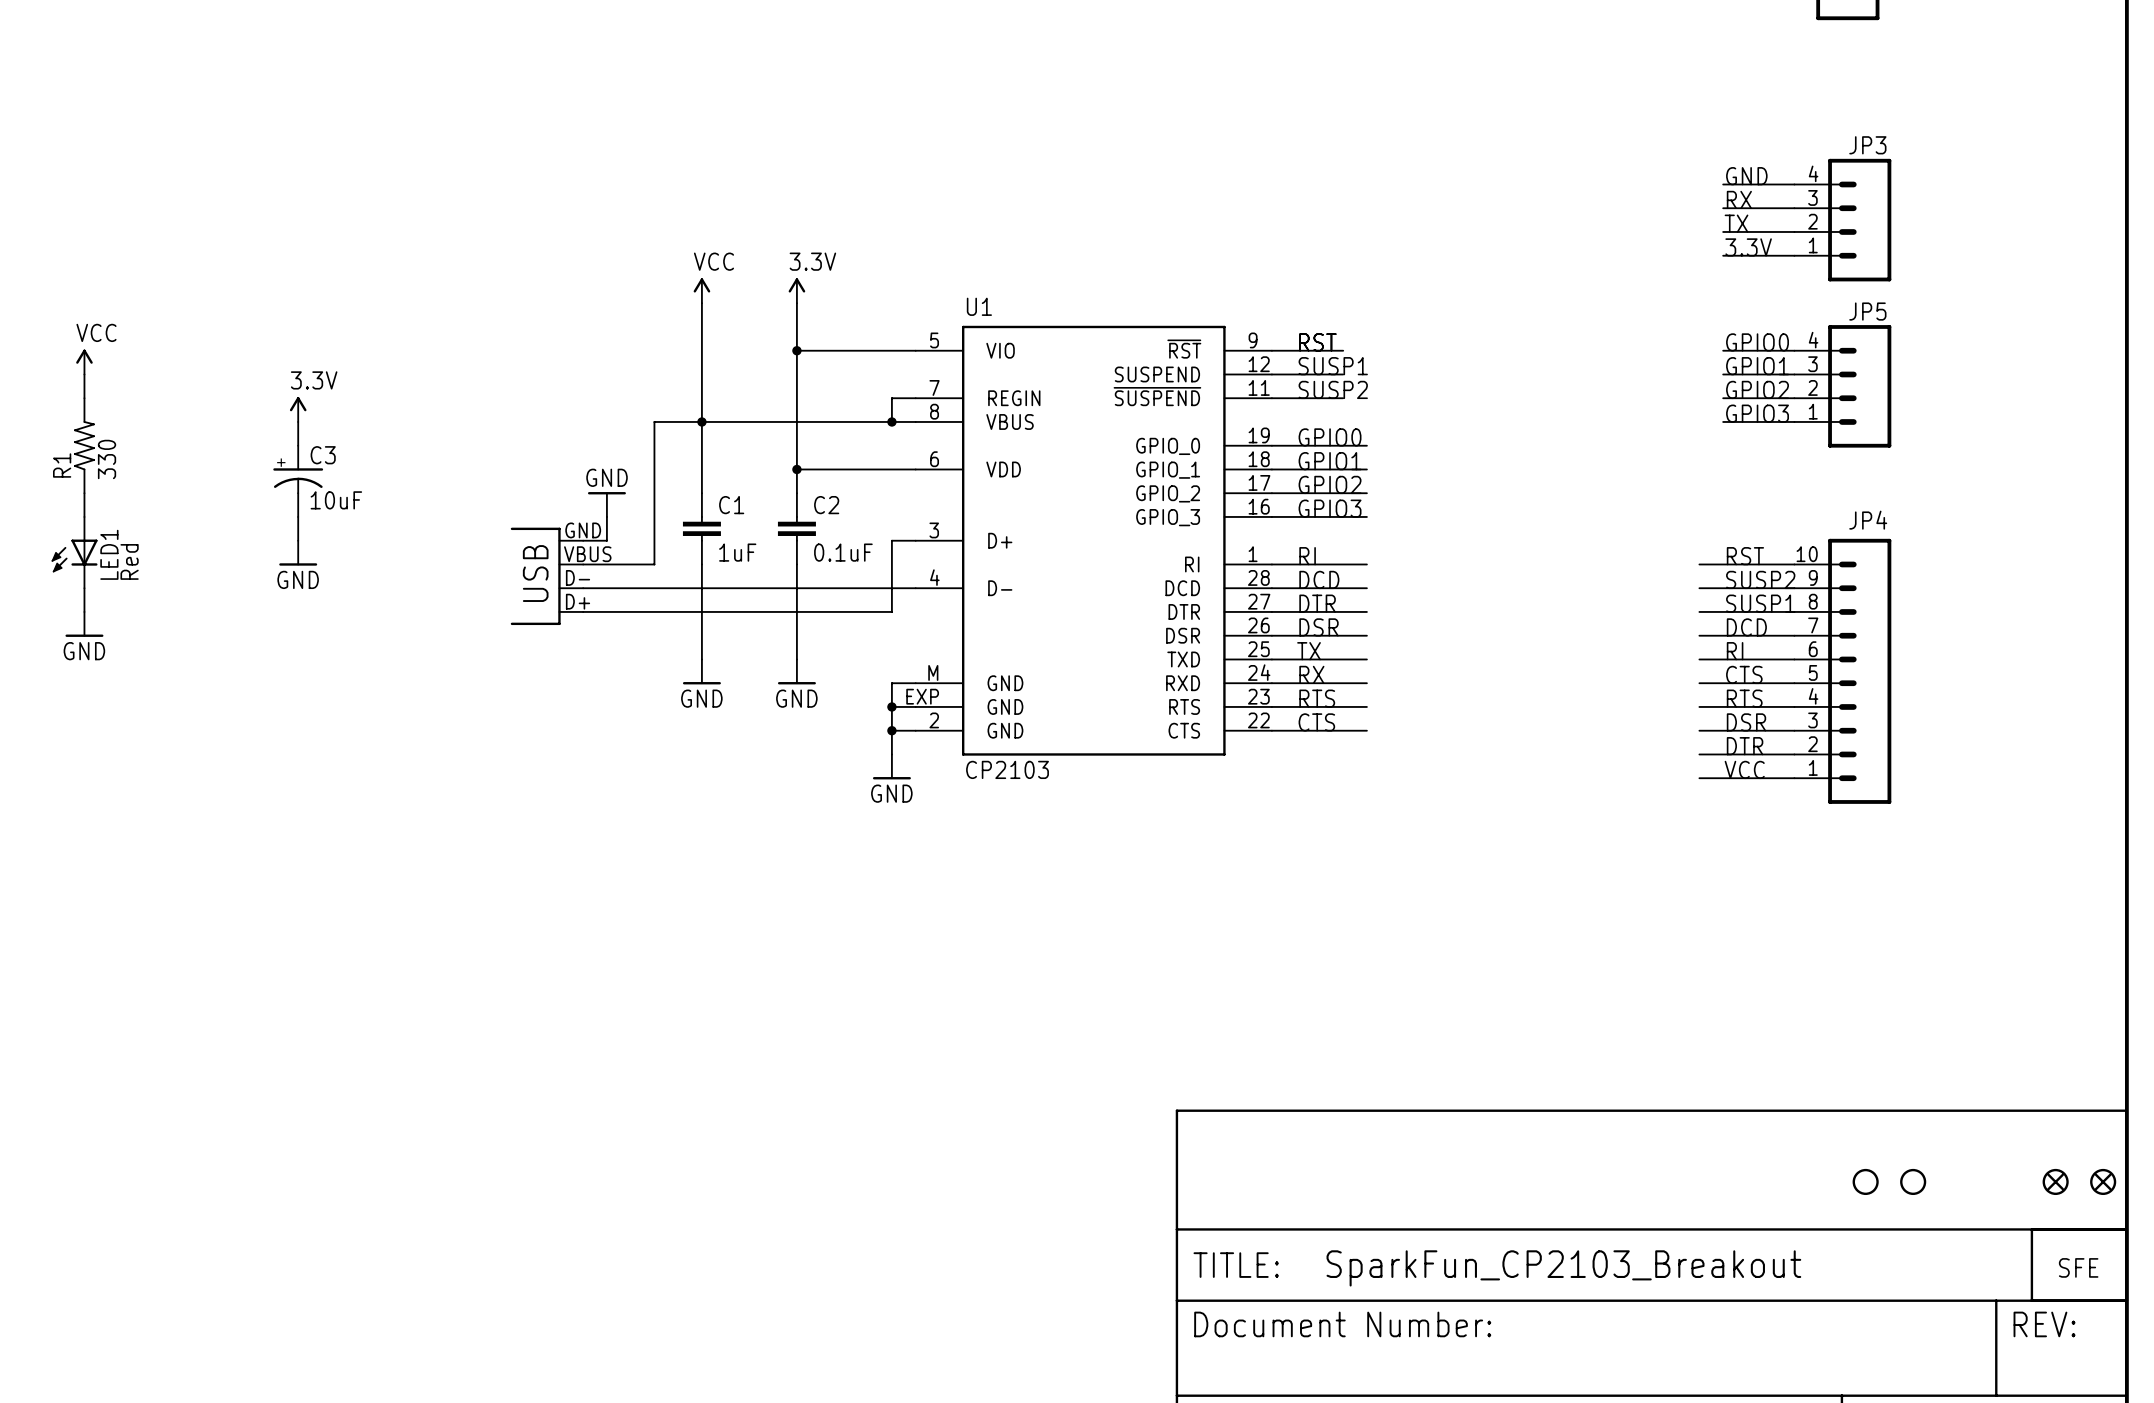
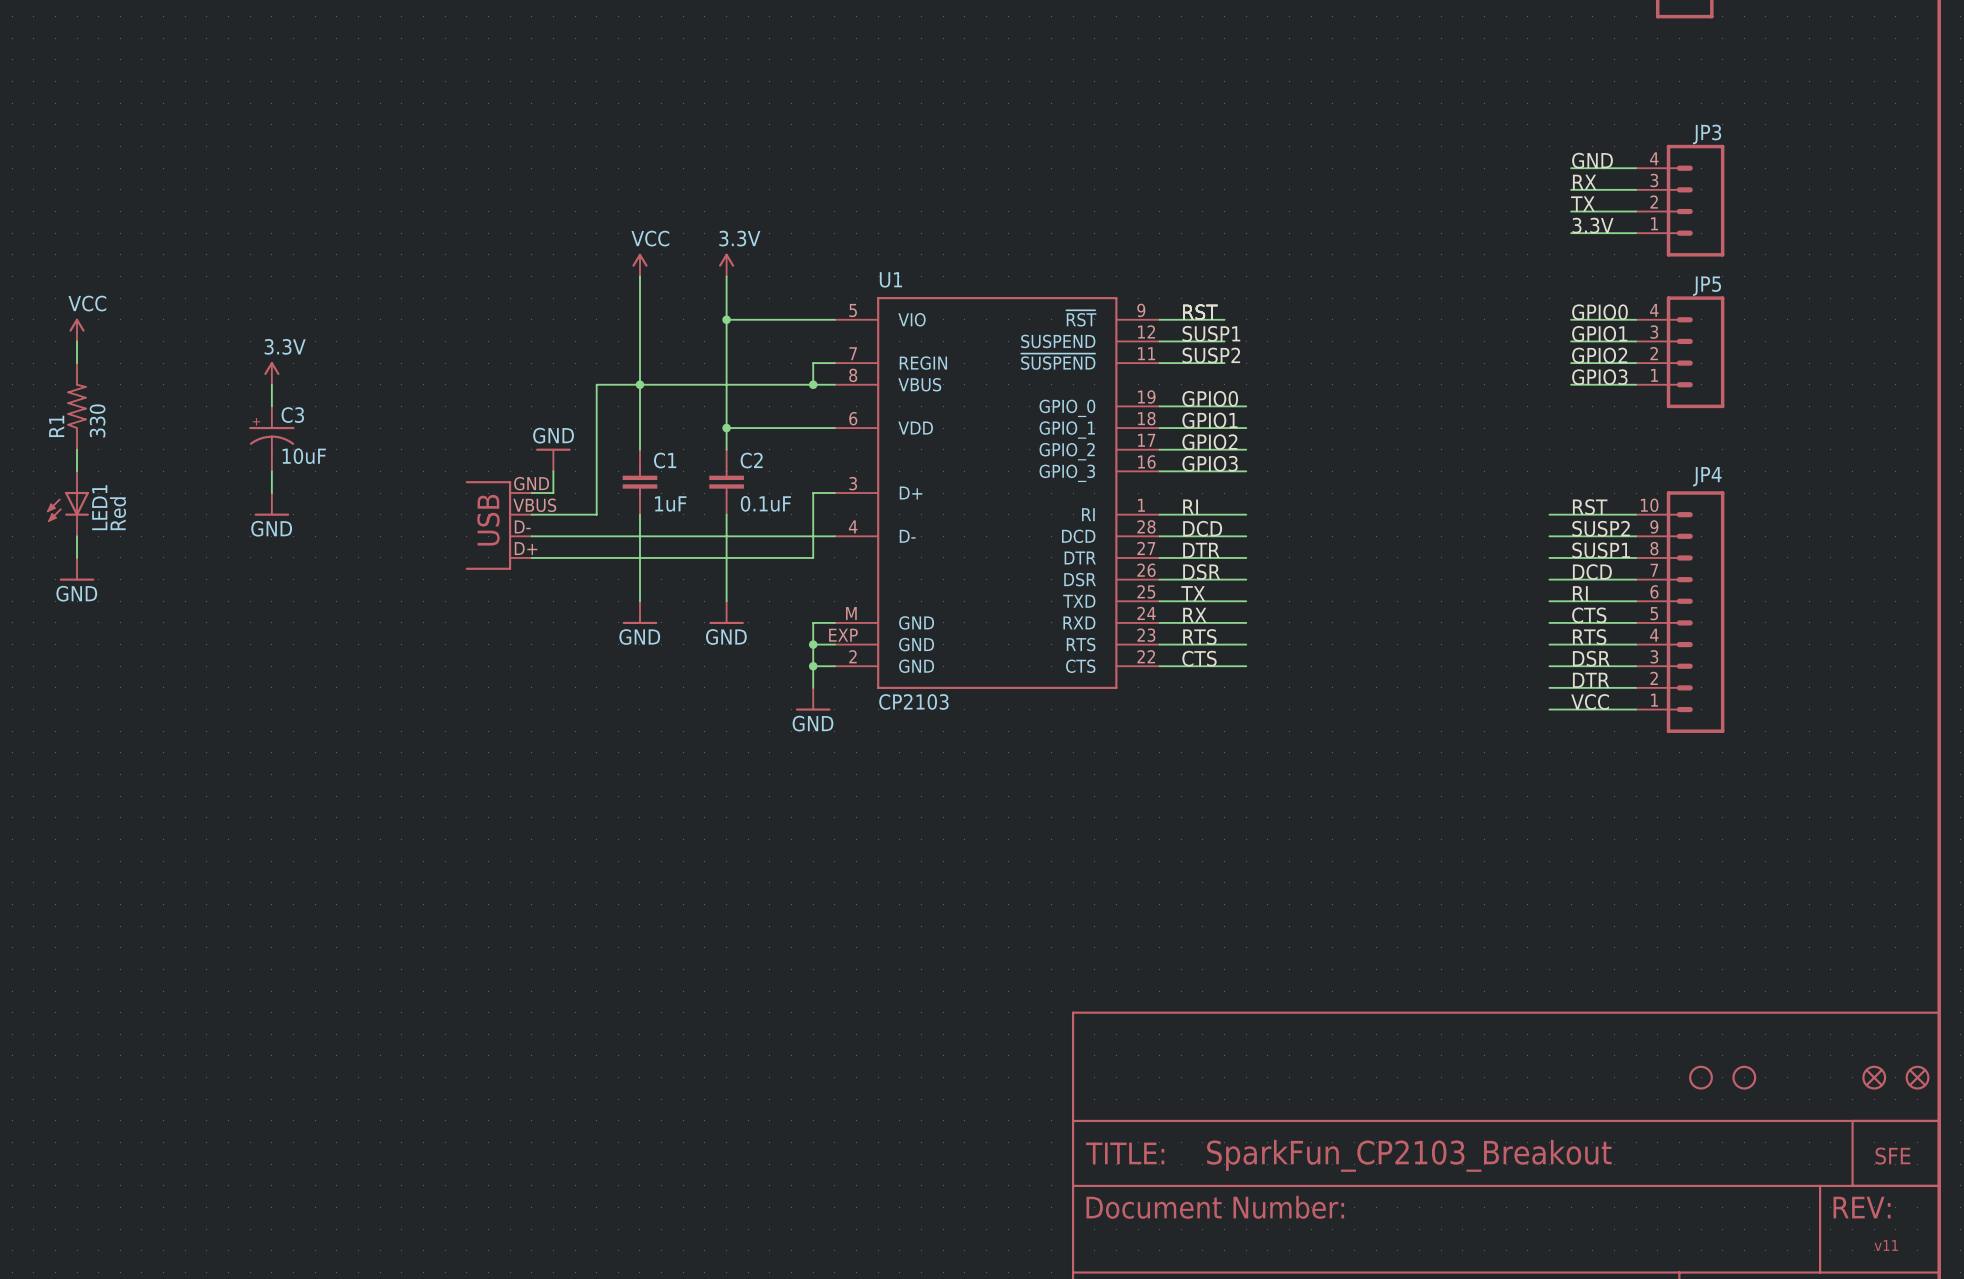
text: none -> v11 (1886, 1245)

